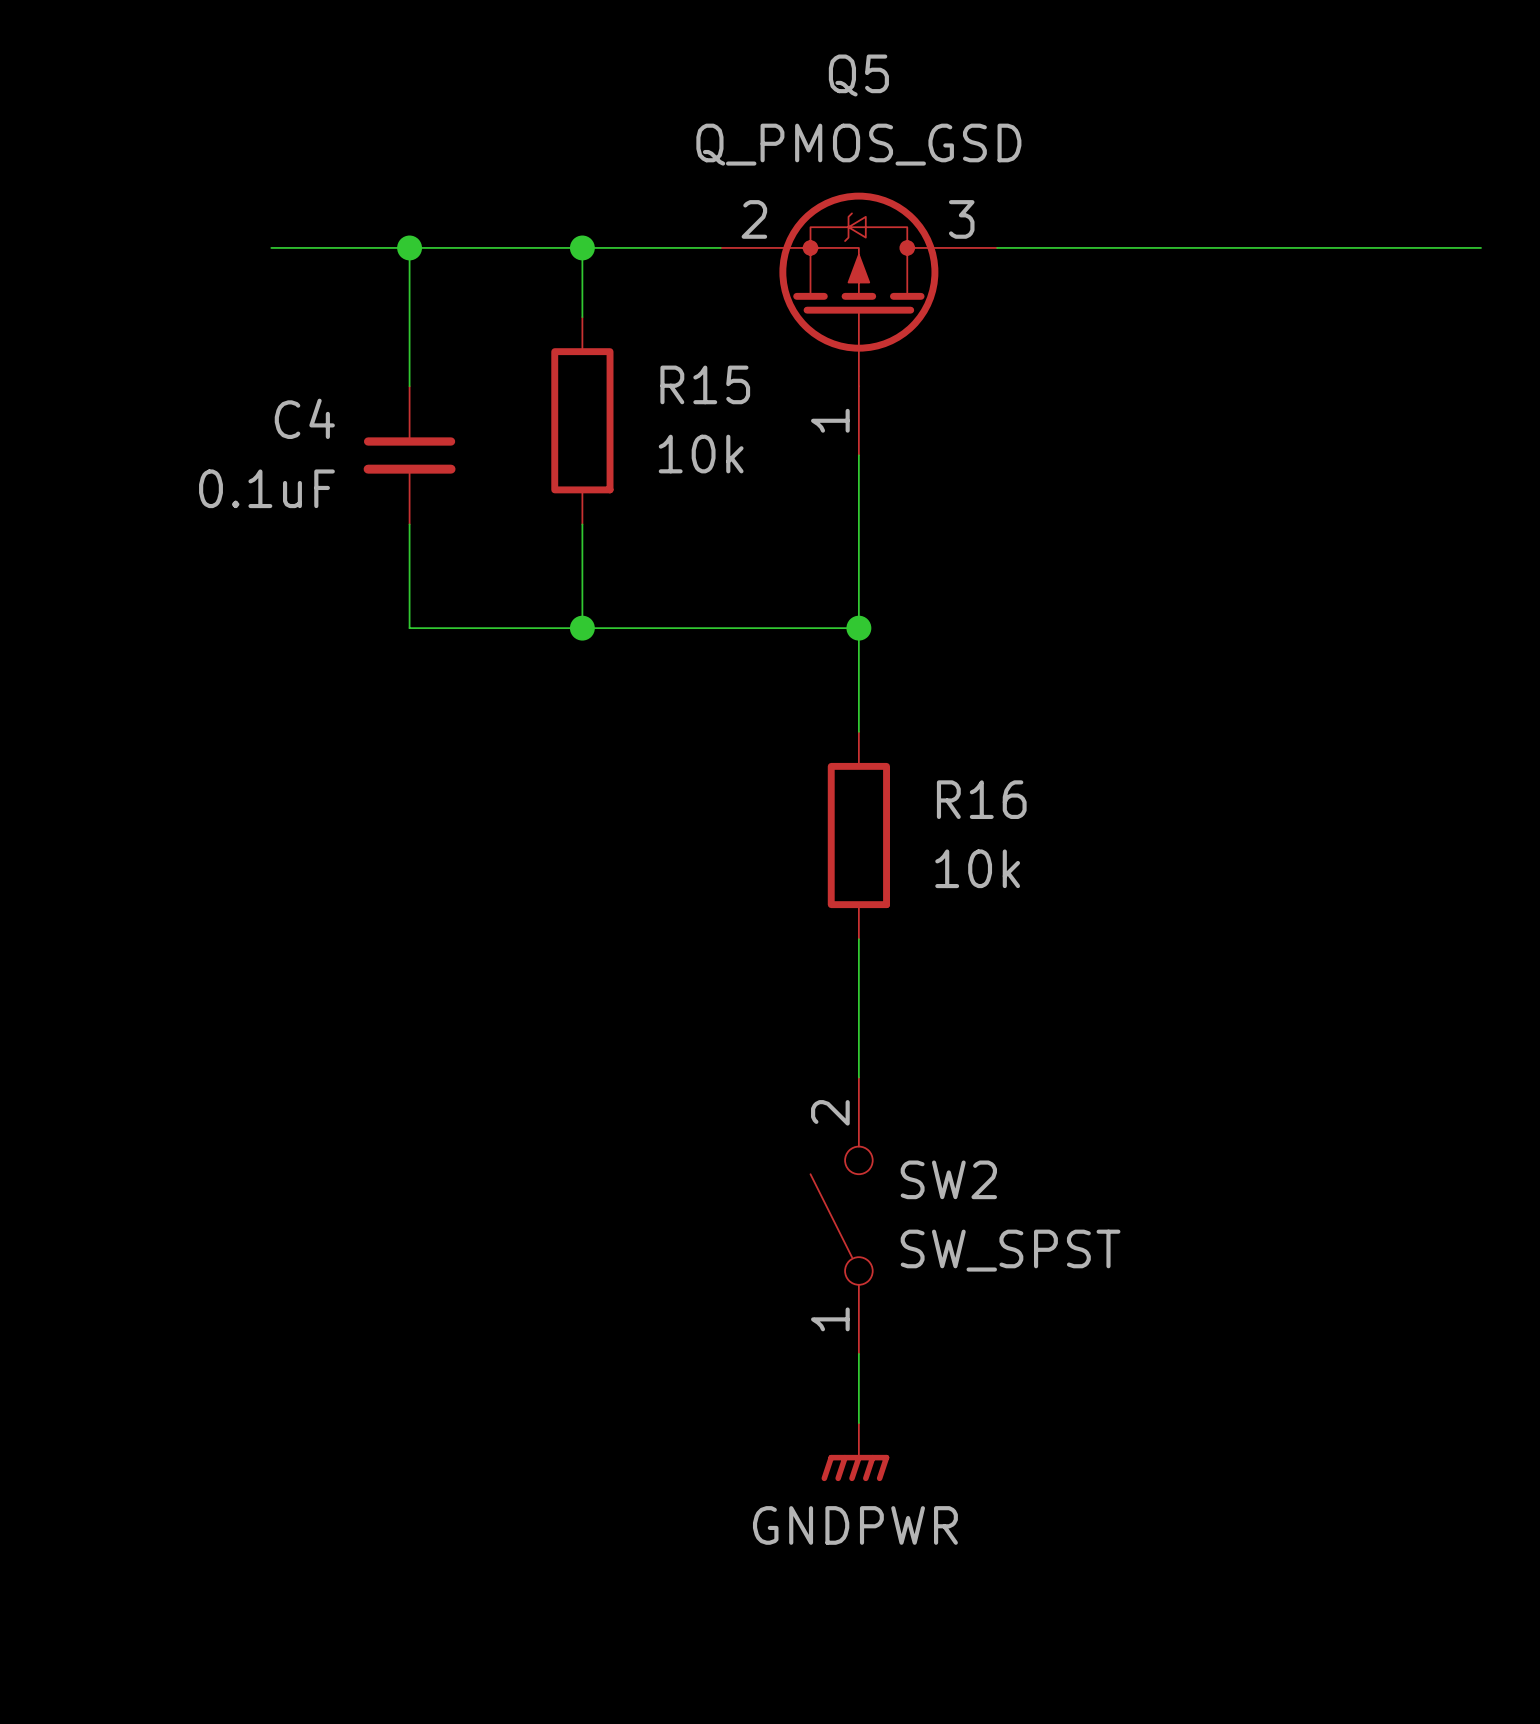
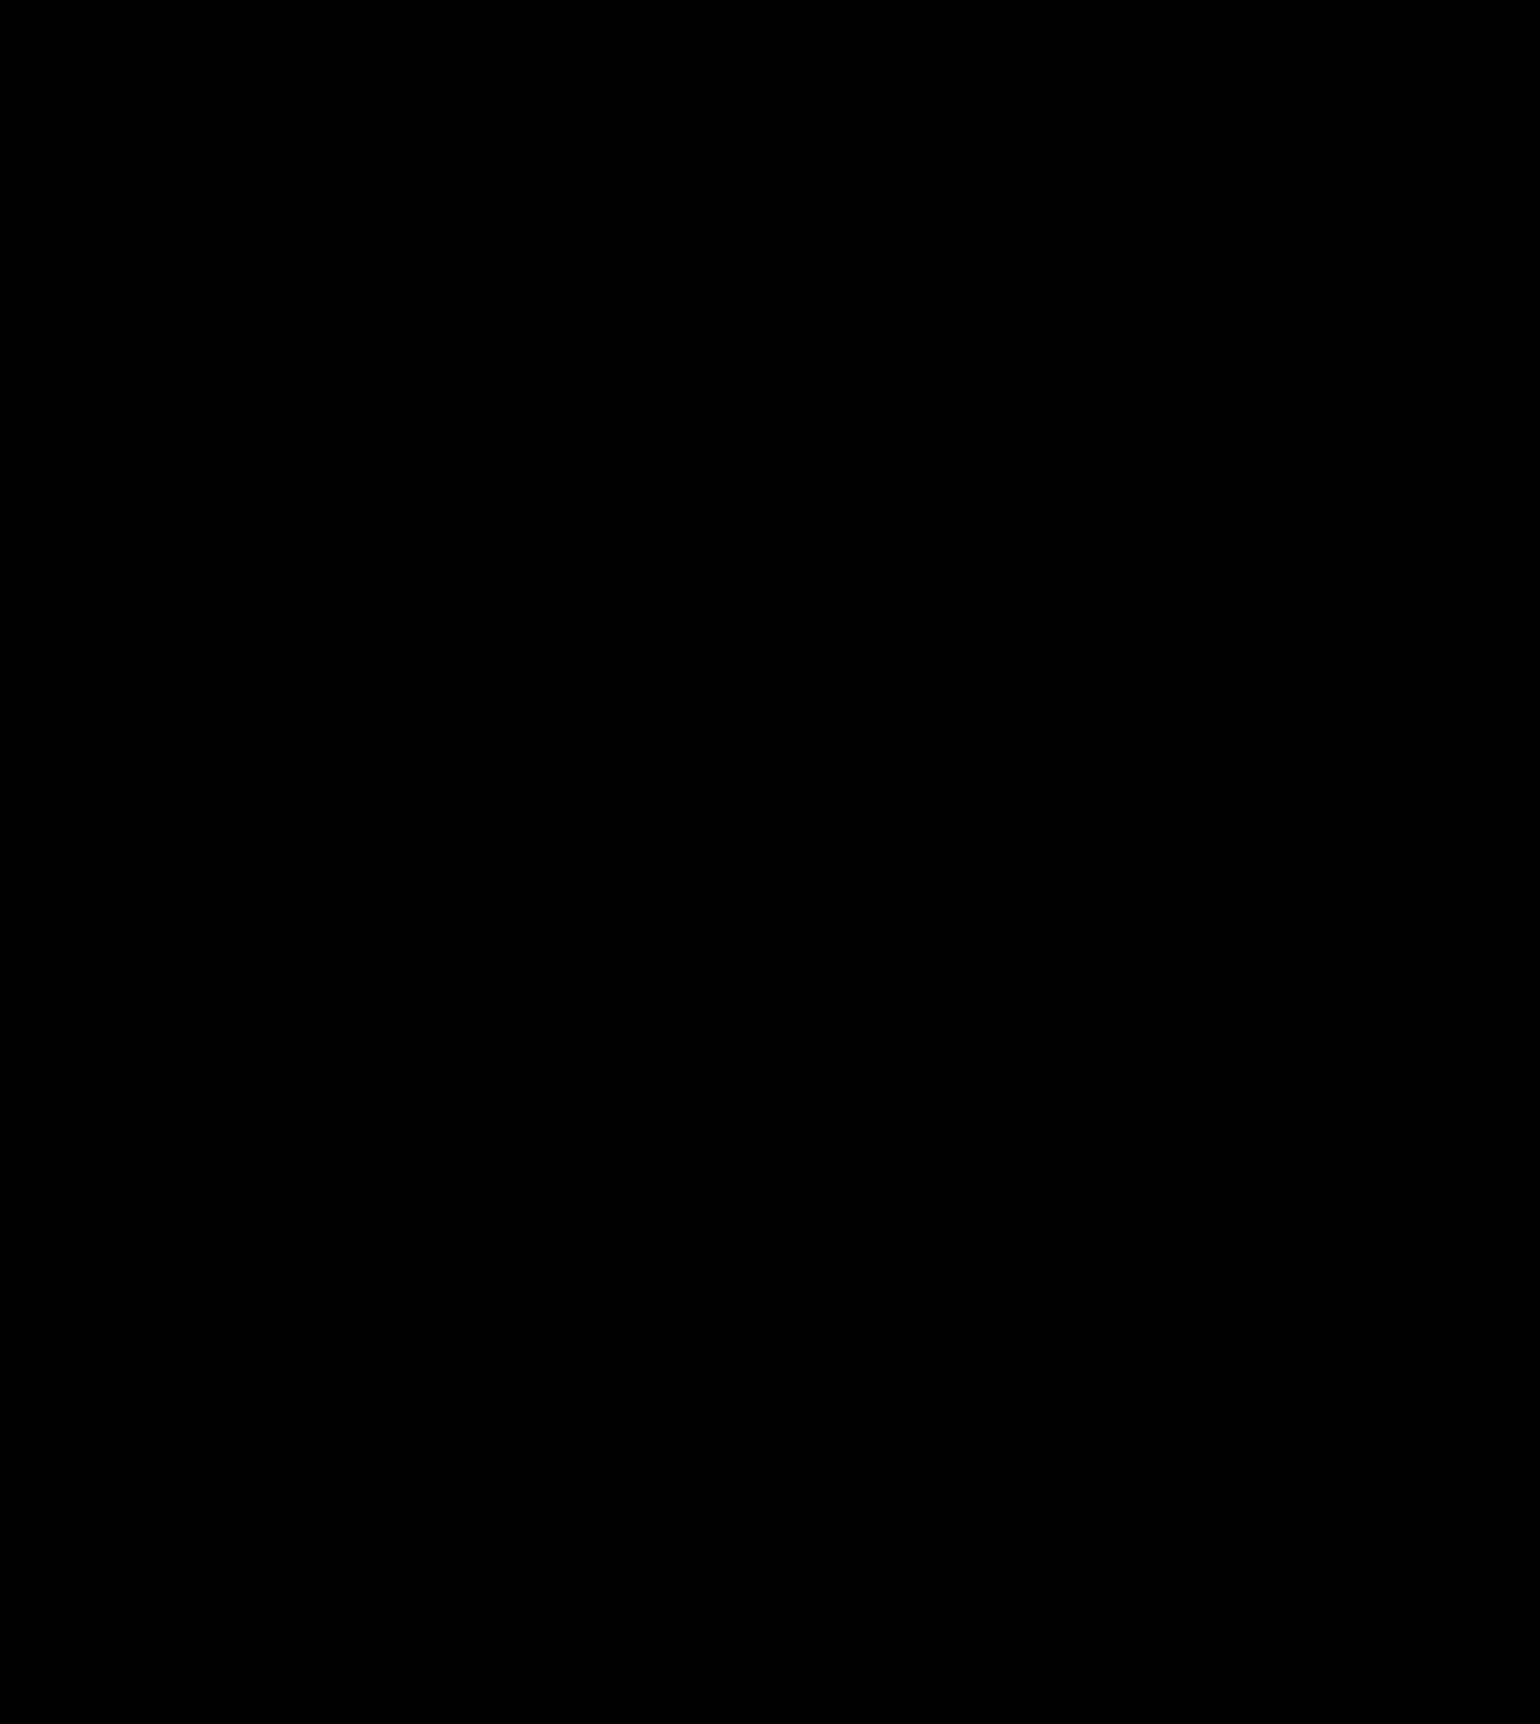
wire: (271, 247) (720, 247) -> none
wire: (409, 247) (409, 386) -> none
junction: (409, 247) -> none
wire: (582, 247) (582, 317) -> none
junction: (582, 247) -> none
wire: (997, 247) (1481, 247) -> none
Q5: Q_PMOS_GSD (858, 323) -> none
R15: 10k (582, 420) -> none
C4: 0.1uF (409, 455) -> none
wire: (858, 455) (858, 731) -> none
wire: (409, 524) (409, 628) (858, 628) -> none
wire: (582, 524) (582, 628) -> none
junction: (582, 628) -> none
junction: (858, 628) -> none
R16: 10k (858, 835) -> none
wire: (858, 939) (858, 1077) -> none
SW2: SW_SPST (841, 1215) -> none
wire: (858, 1353) (858, 1423) -> none
power symbol: GNDPWR (855, 1452) -> none

